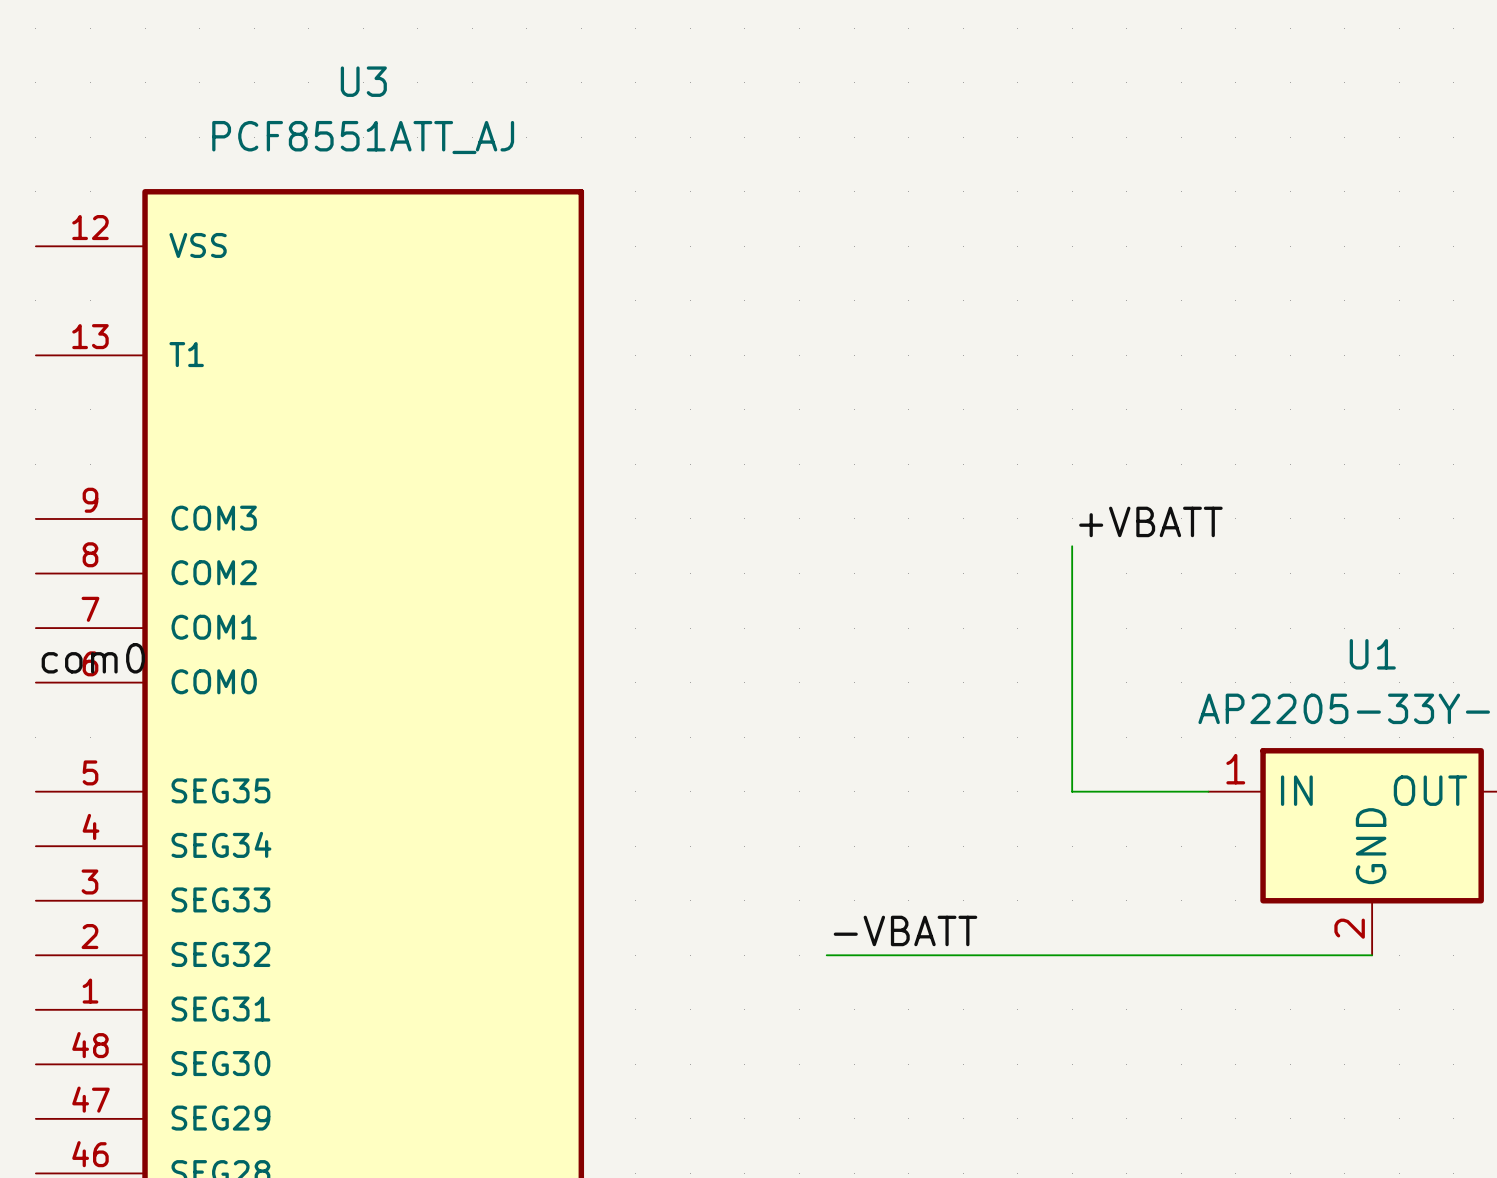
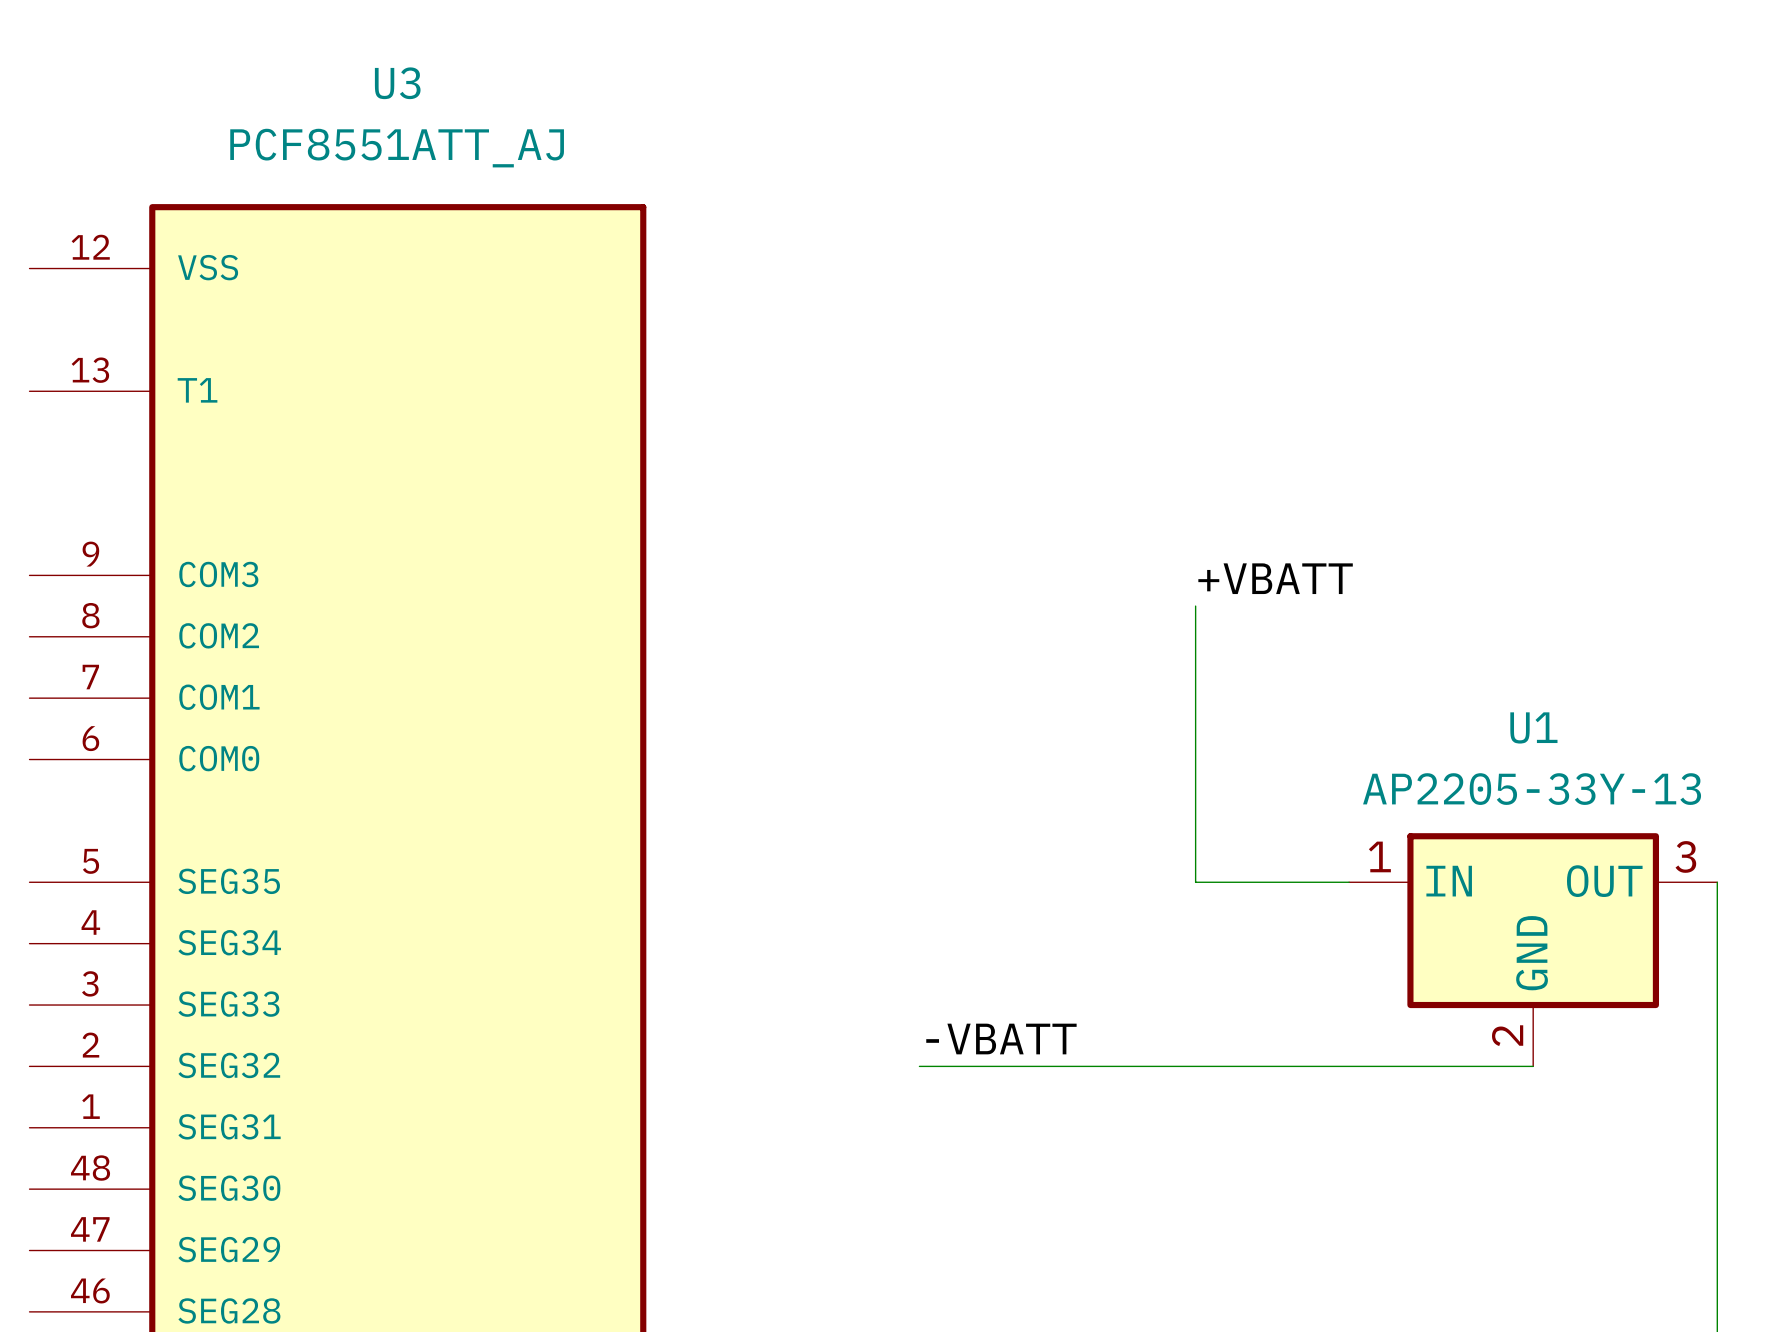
label: com0 (93, 658) -> none

